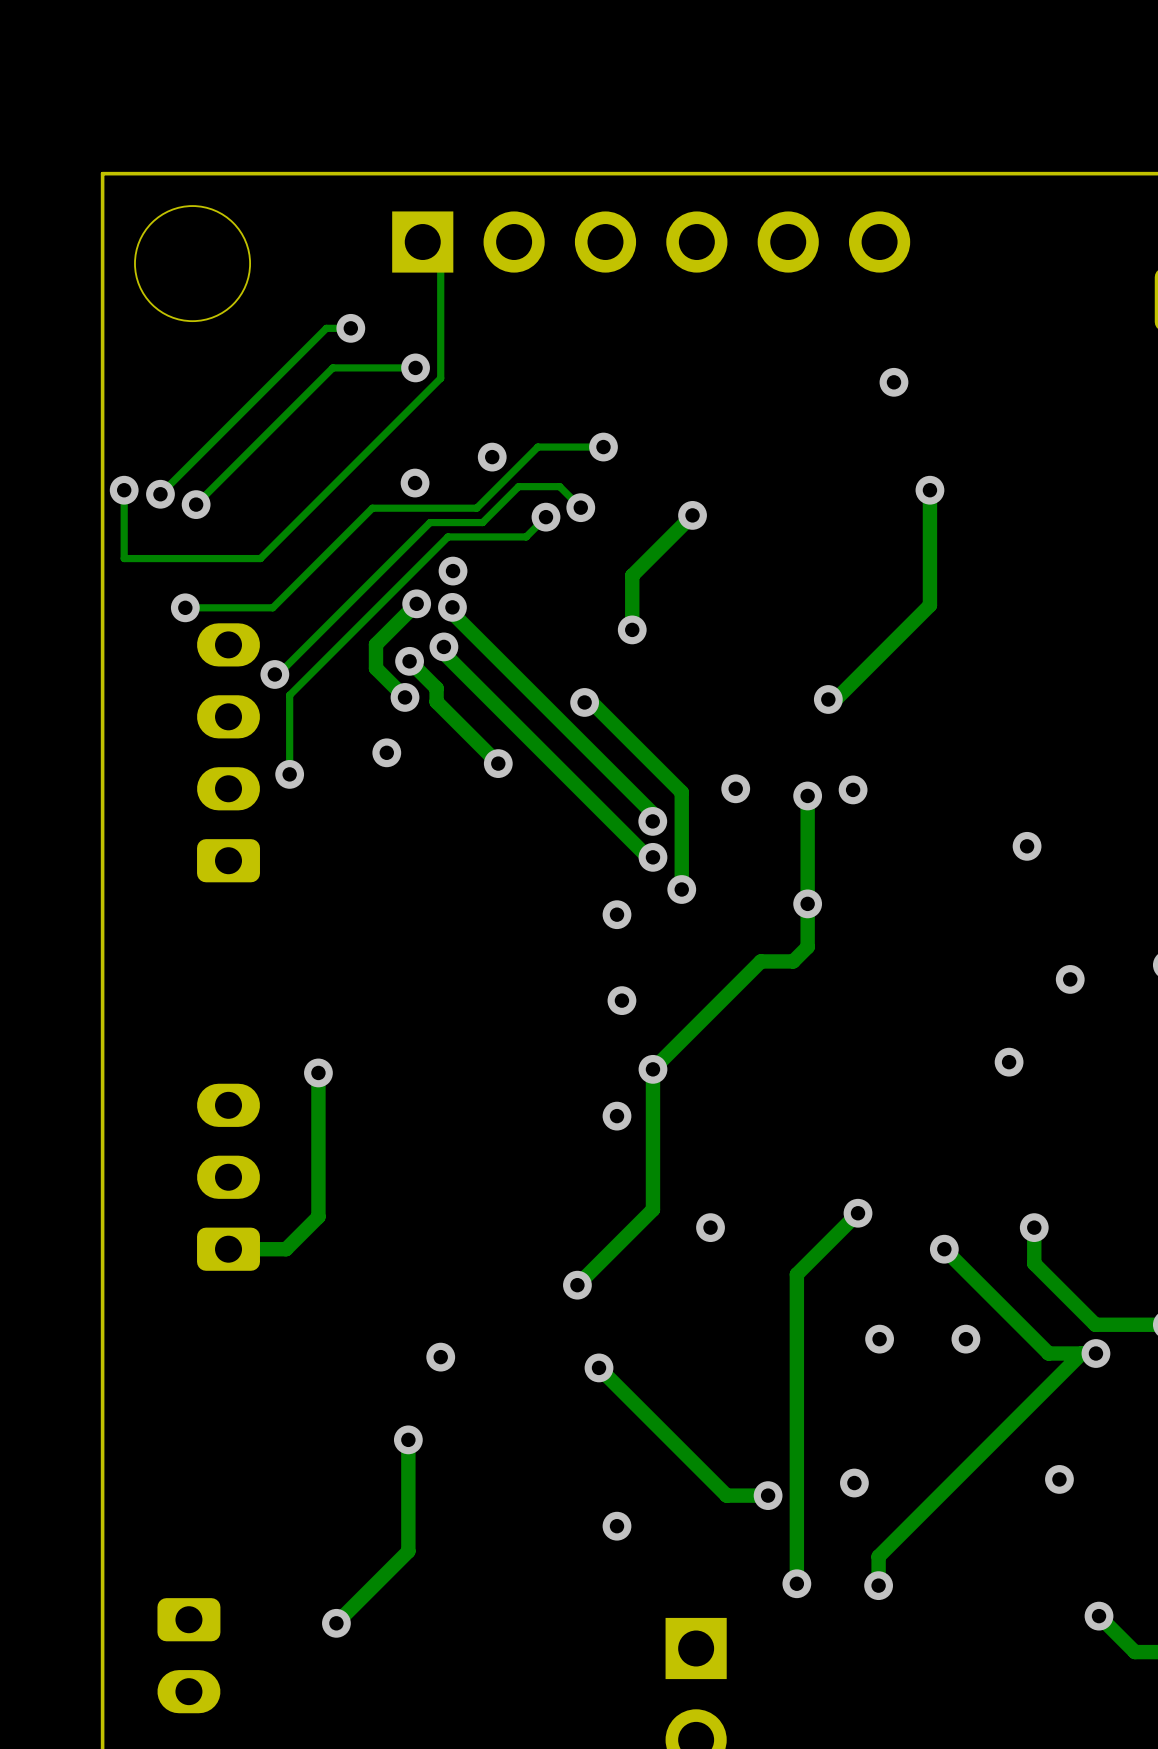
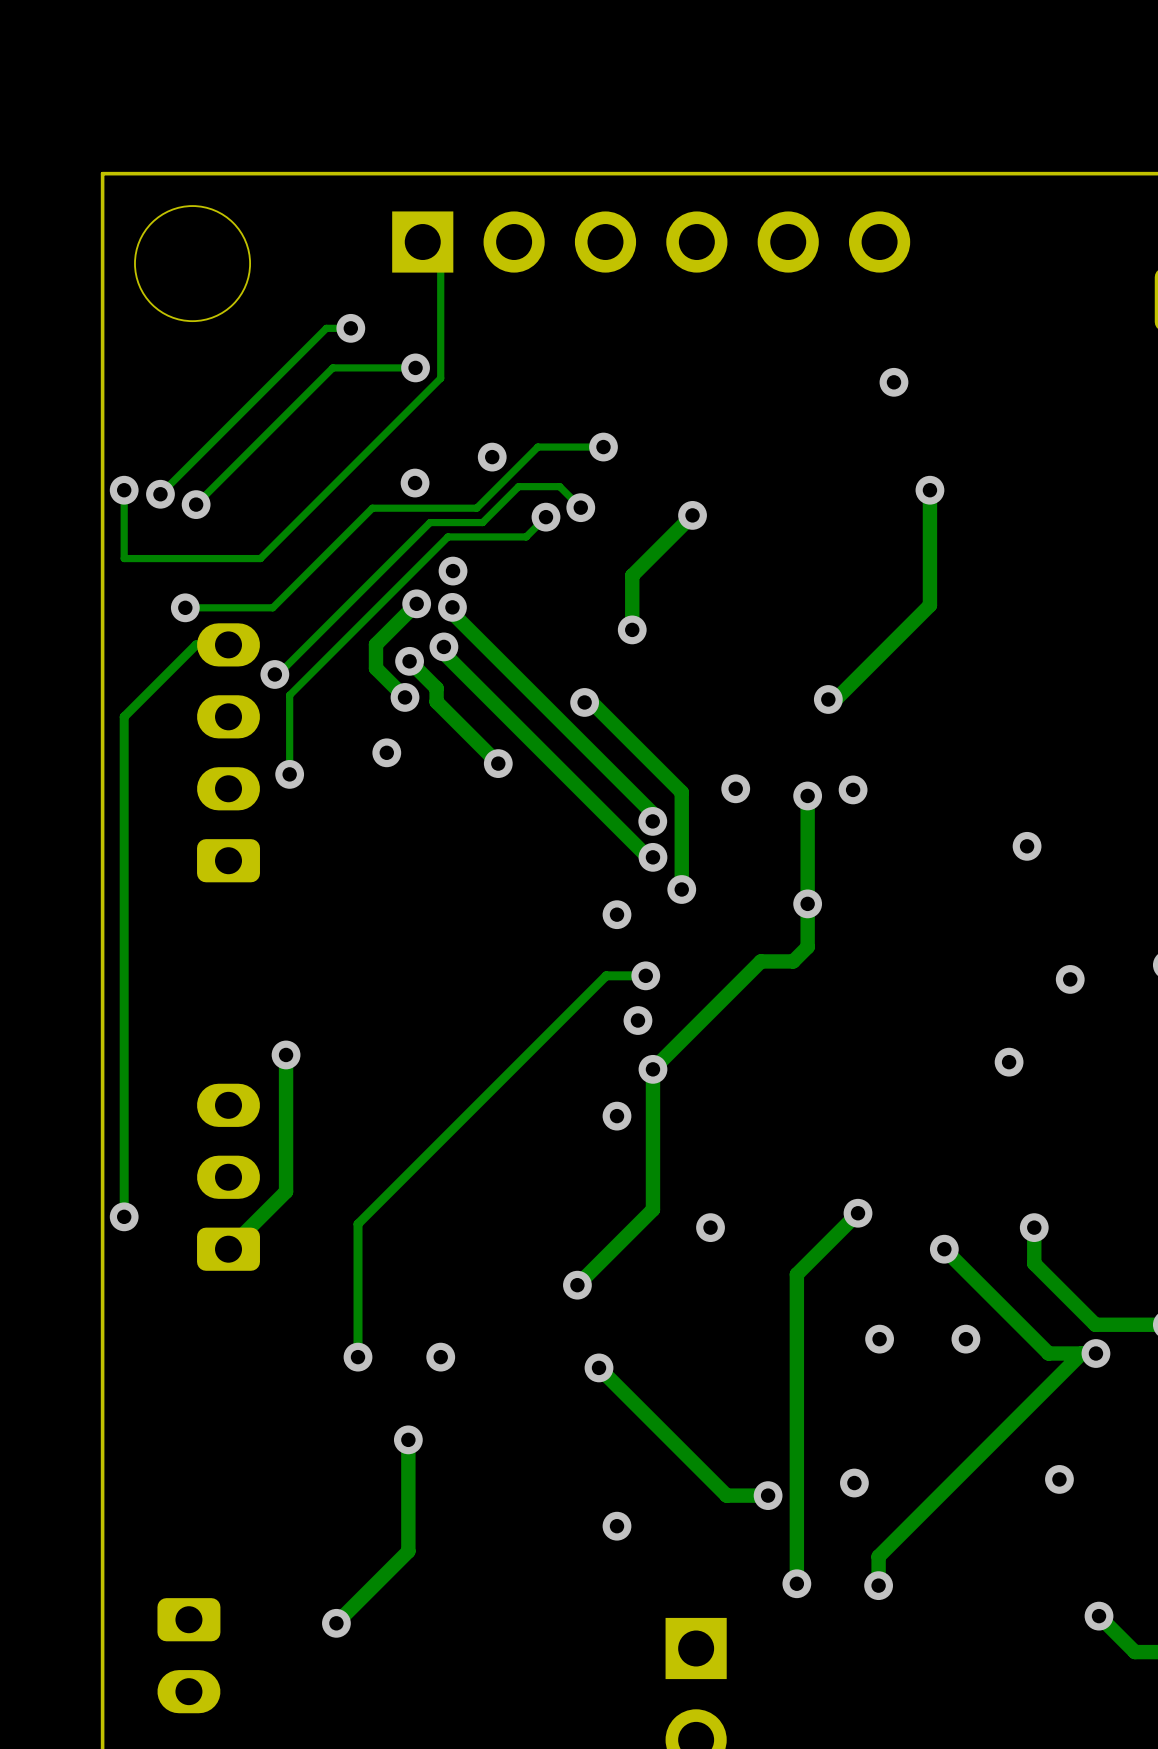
track: none -> (228, 644) (196, 644) (124, 716) (124, 1216)
track: none -> (645, 975) (606, 975) (358, 1224) (358, 1357)
via: none -> (645, 975)
via: (621, 1000) -> none
via: none -> (637, 1020)
track: (318, 1072) (318, 1216) (286, 1249) (228, 1249) -> (286, 1054) (286, 1191) (228, 1249)
via position: (318, 1072) -> (286, 1054)
via: none -> (124, 1216)
via: none -> (358, 1357)

